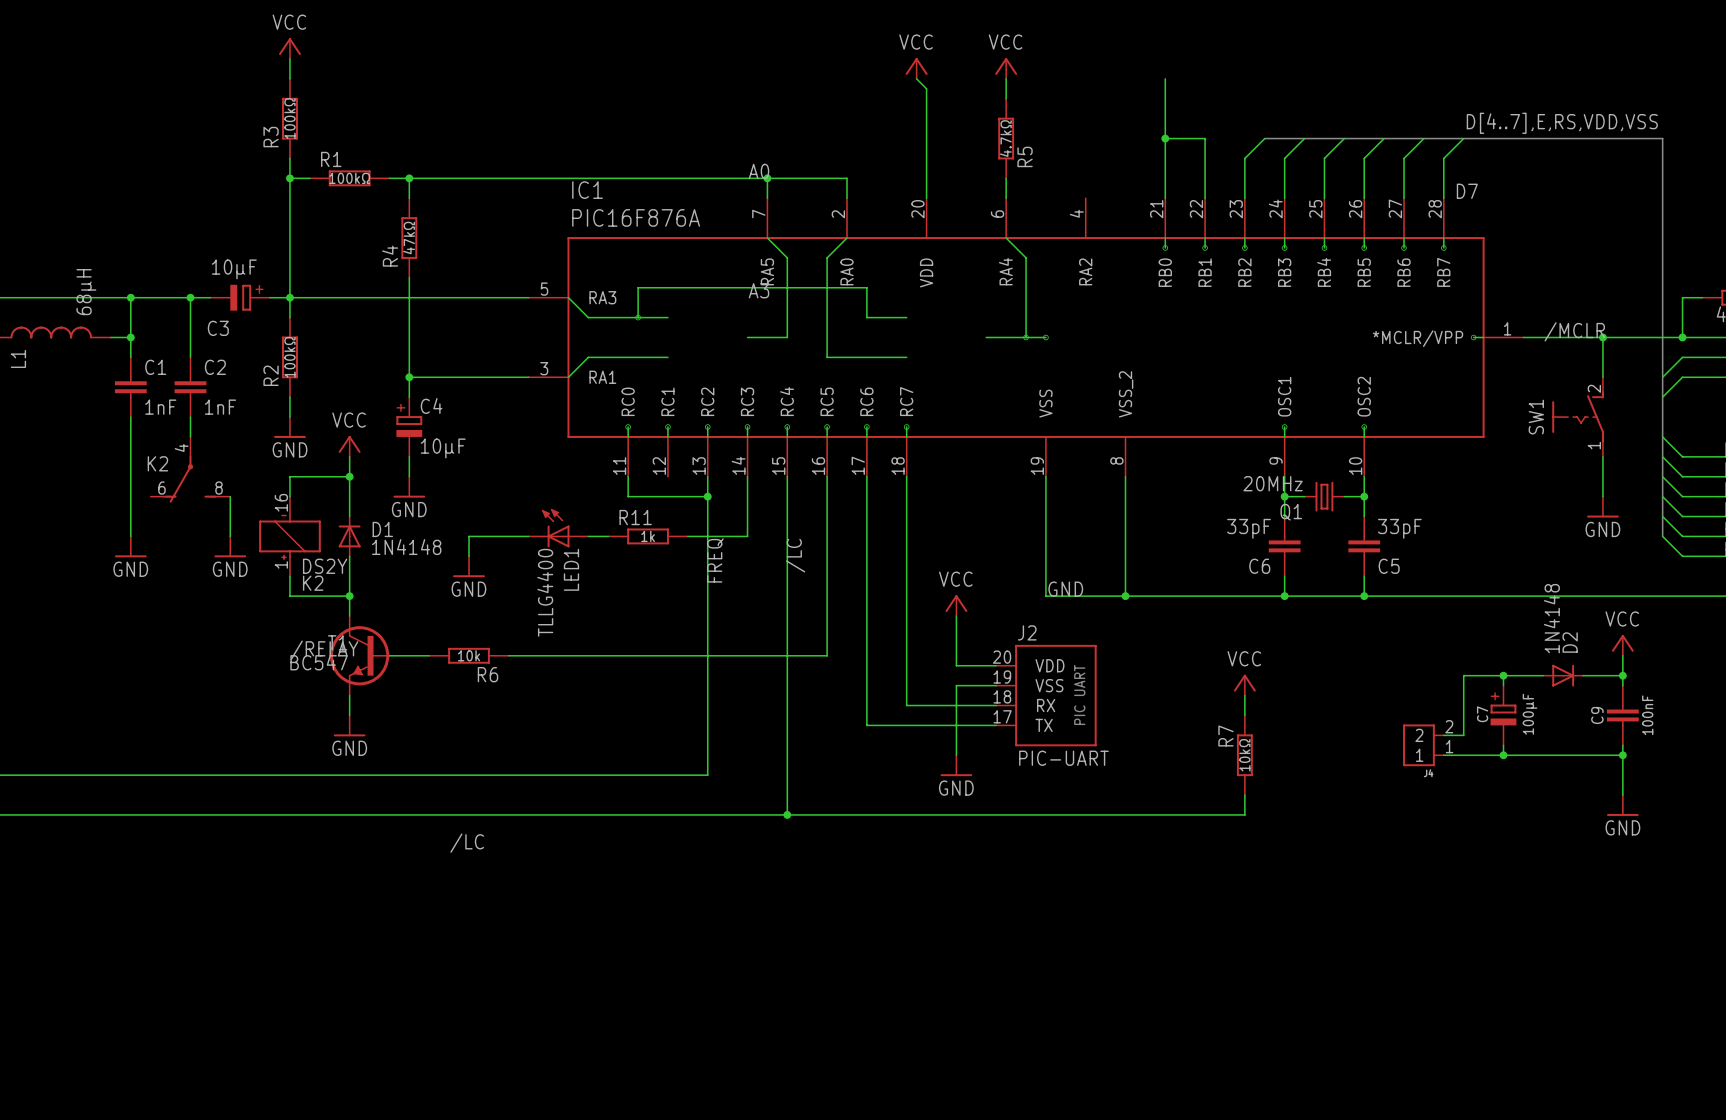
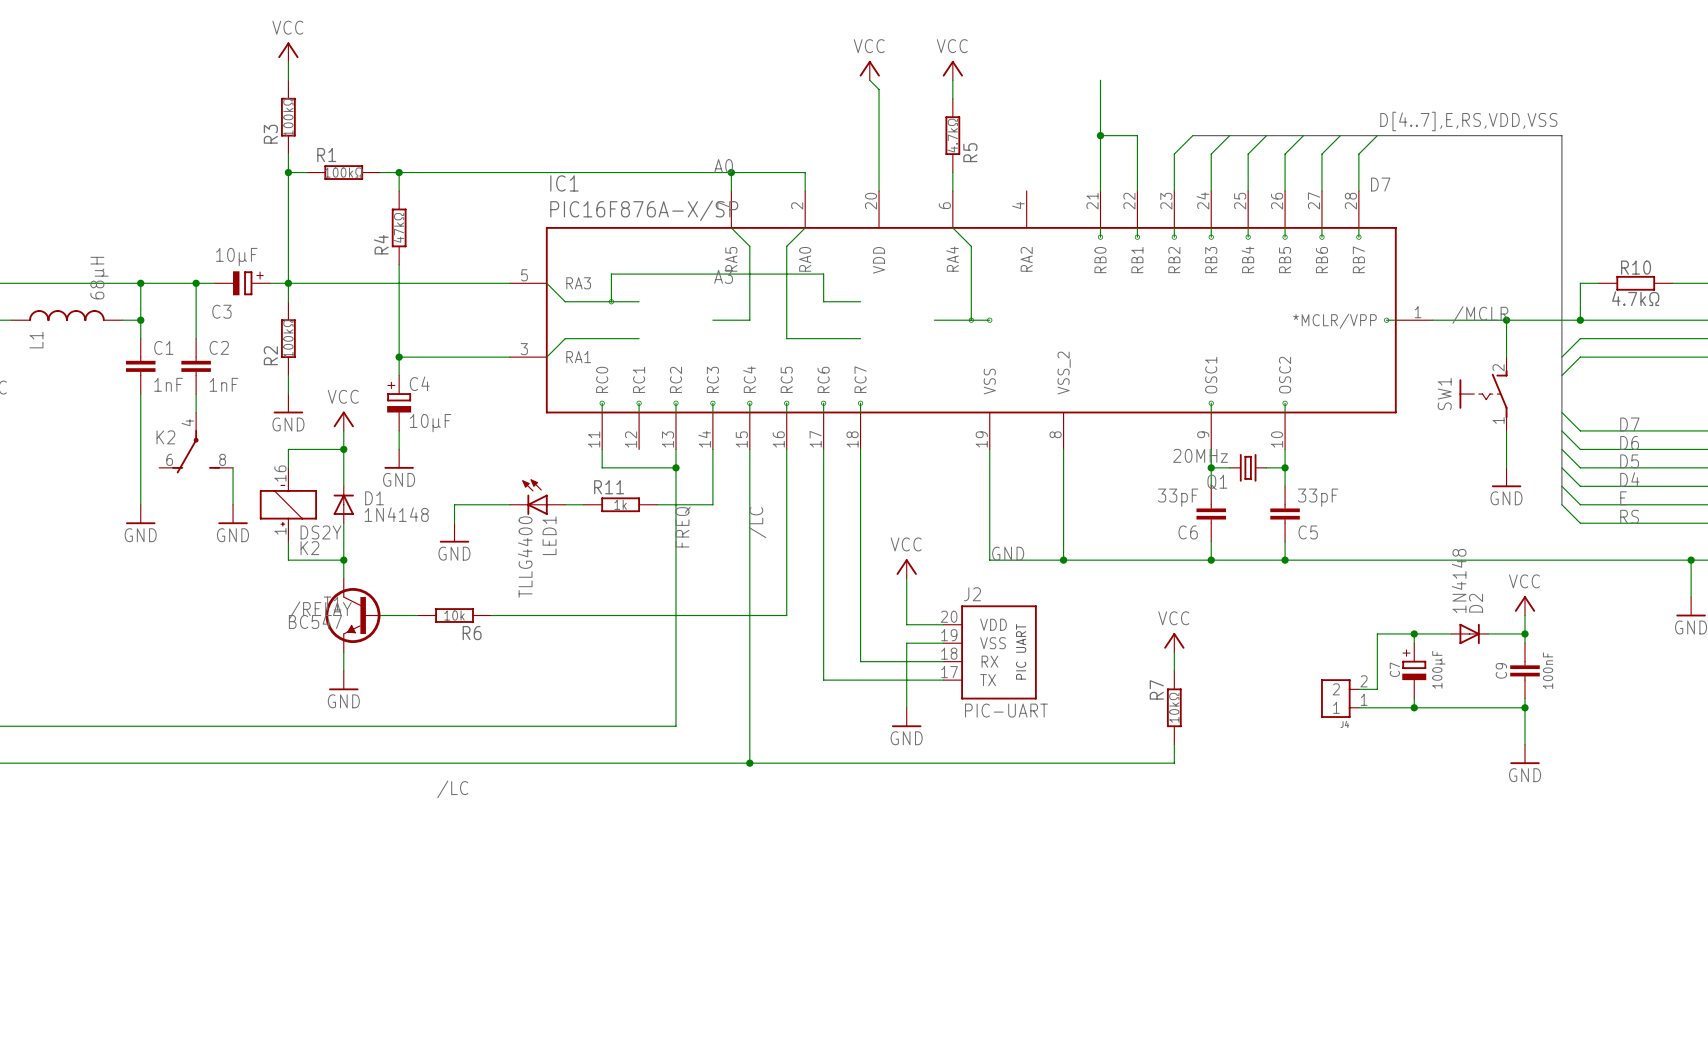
IC1 value: PIC16F876A (636, 217) -> PIC16F876A-X/SP (644, 210)

